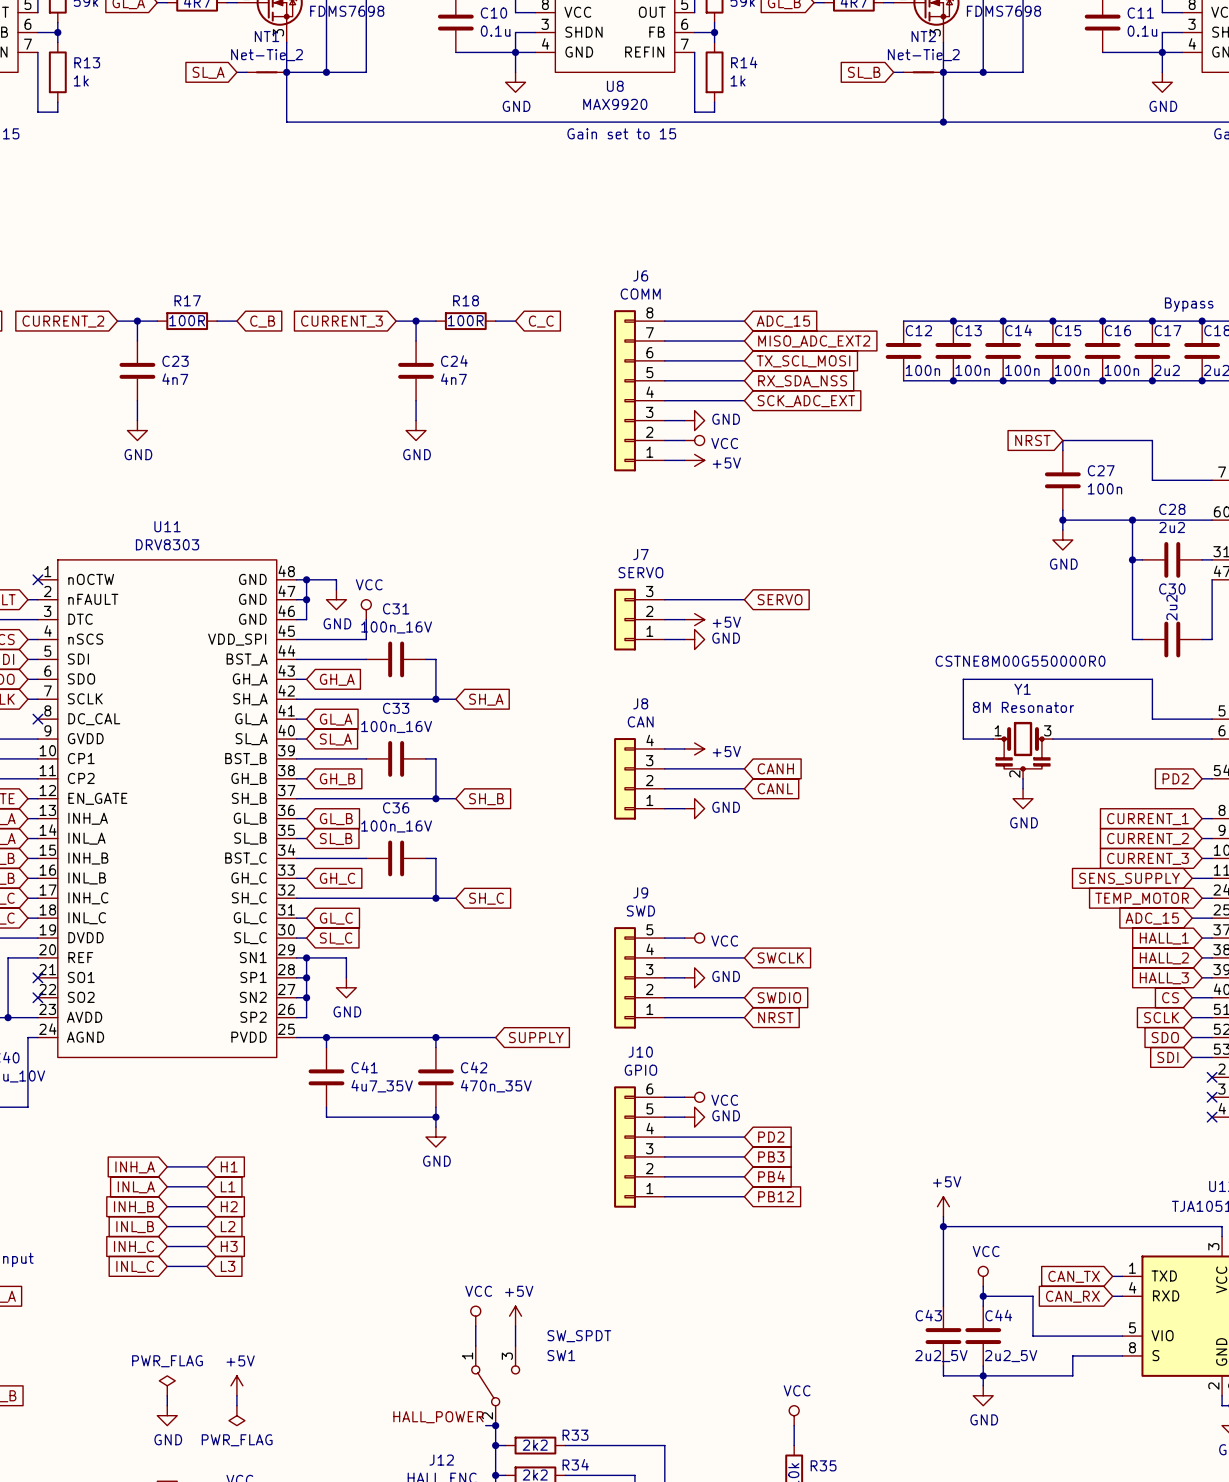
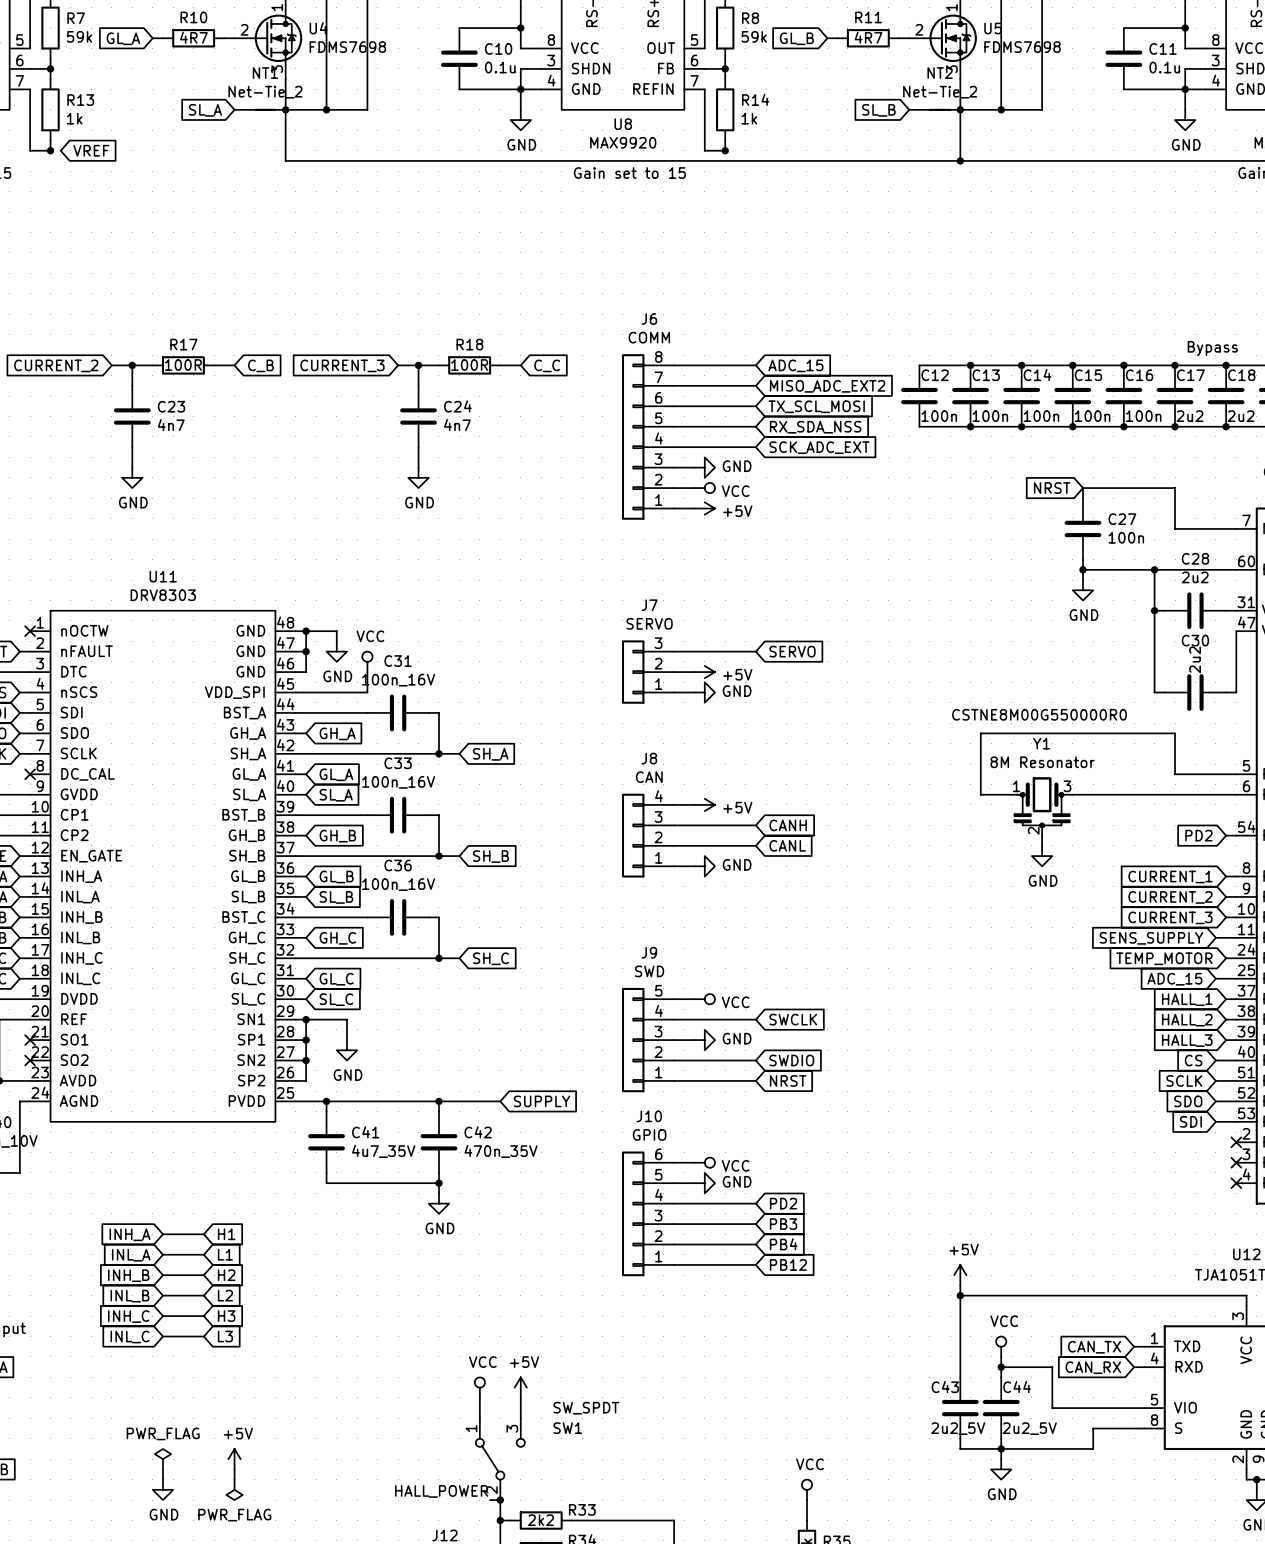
junction: none -> (50, 150)
global label: none -> VREF (91, 150)
junction: none -> (725, 150)

